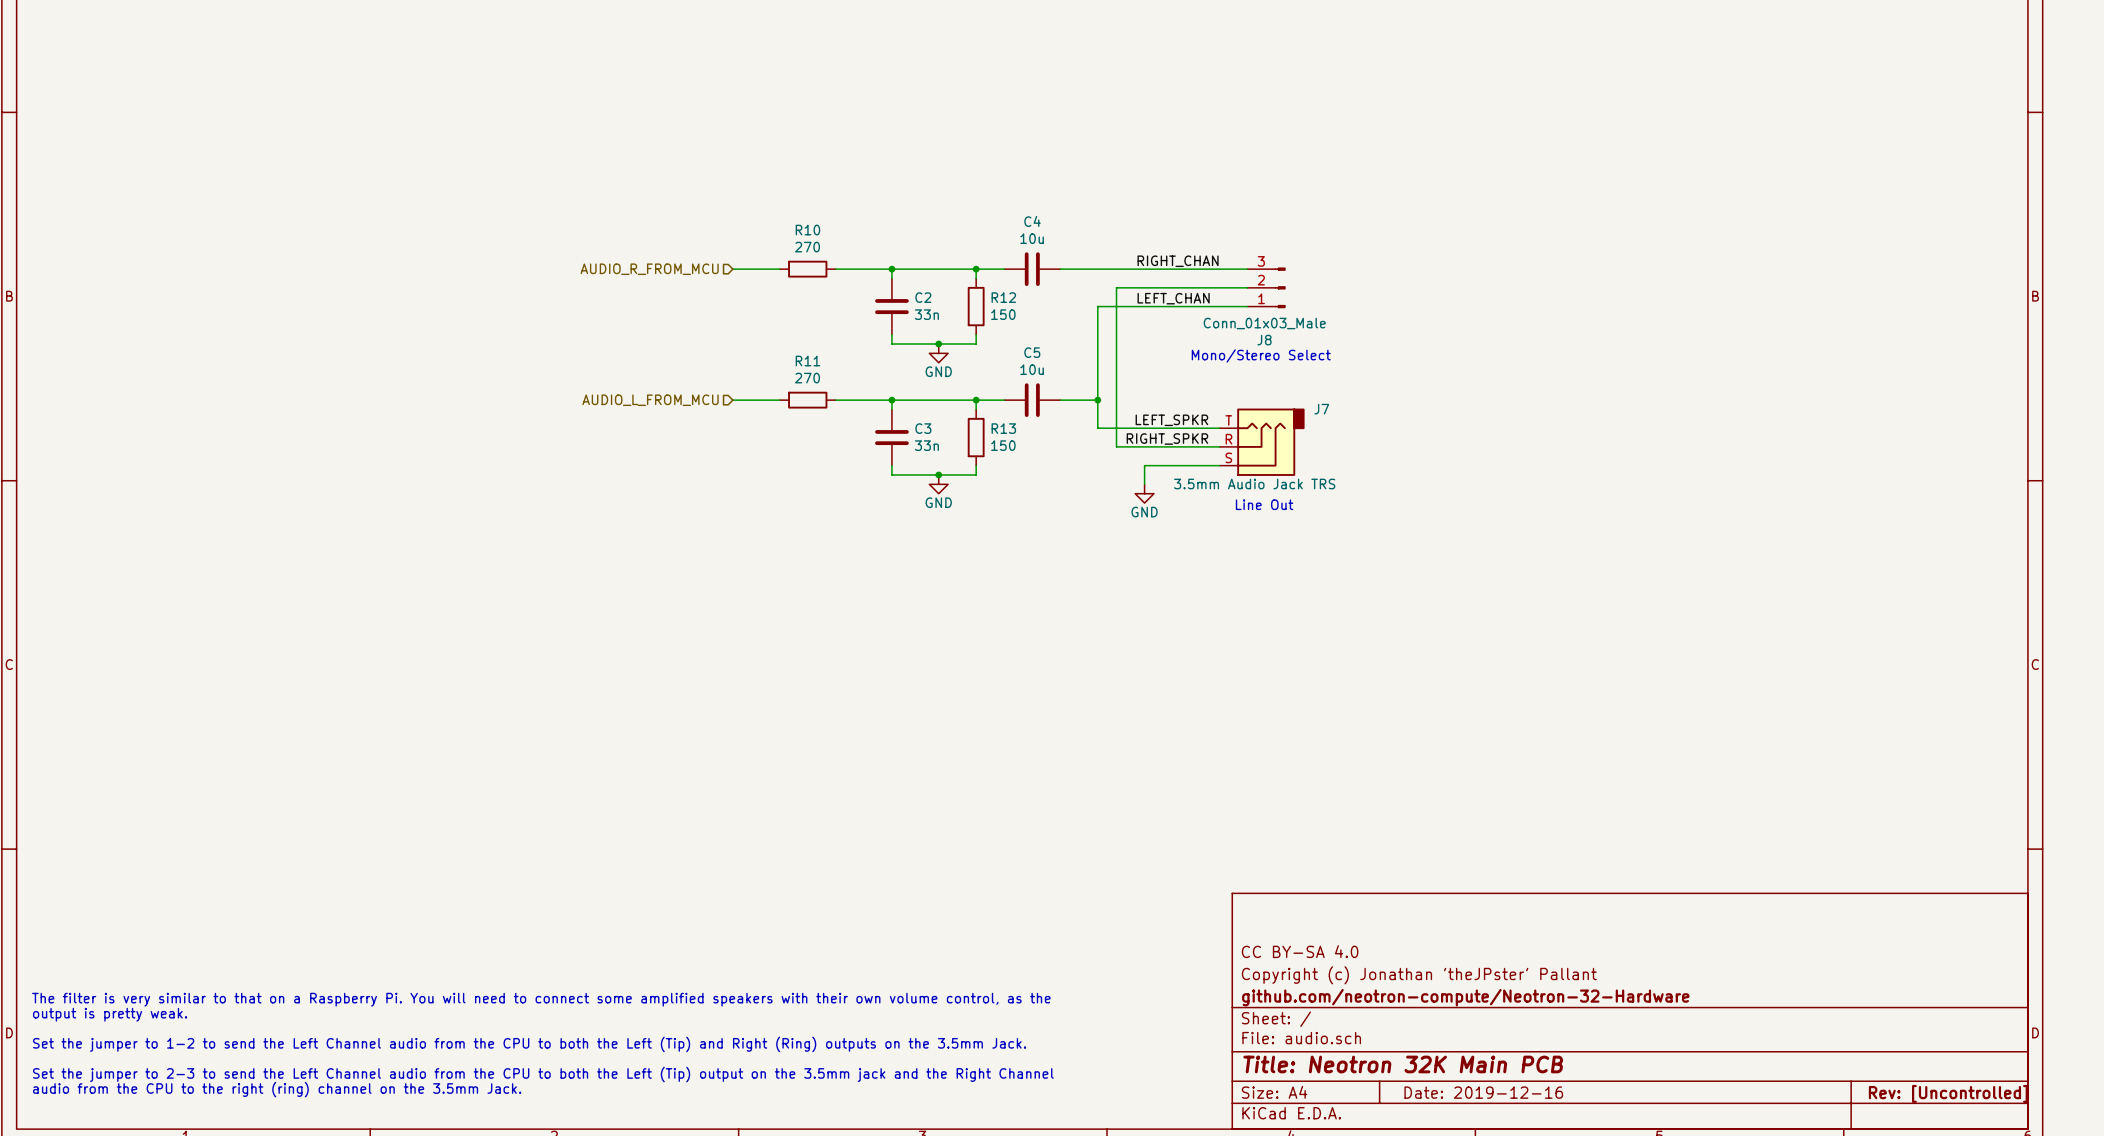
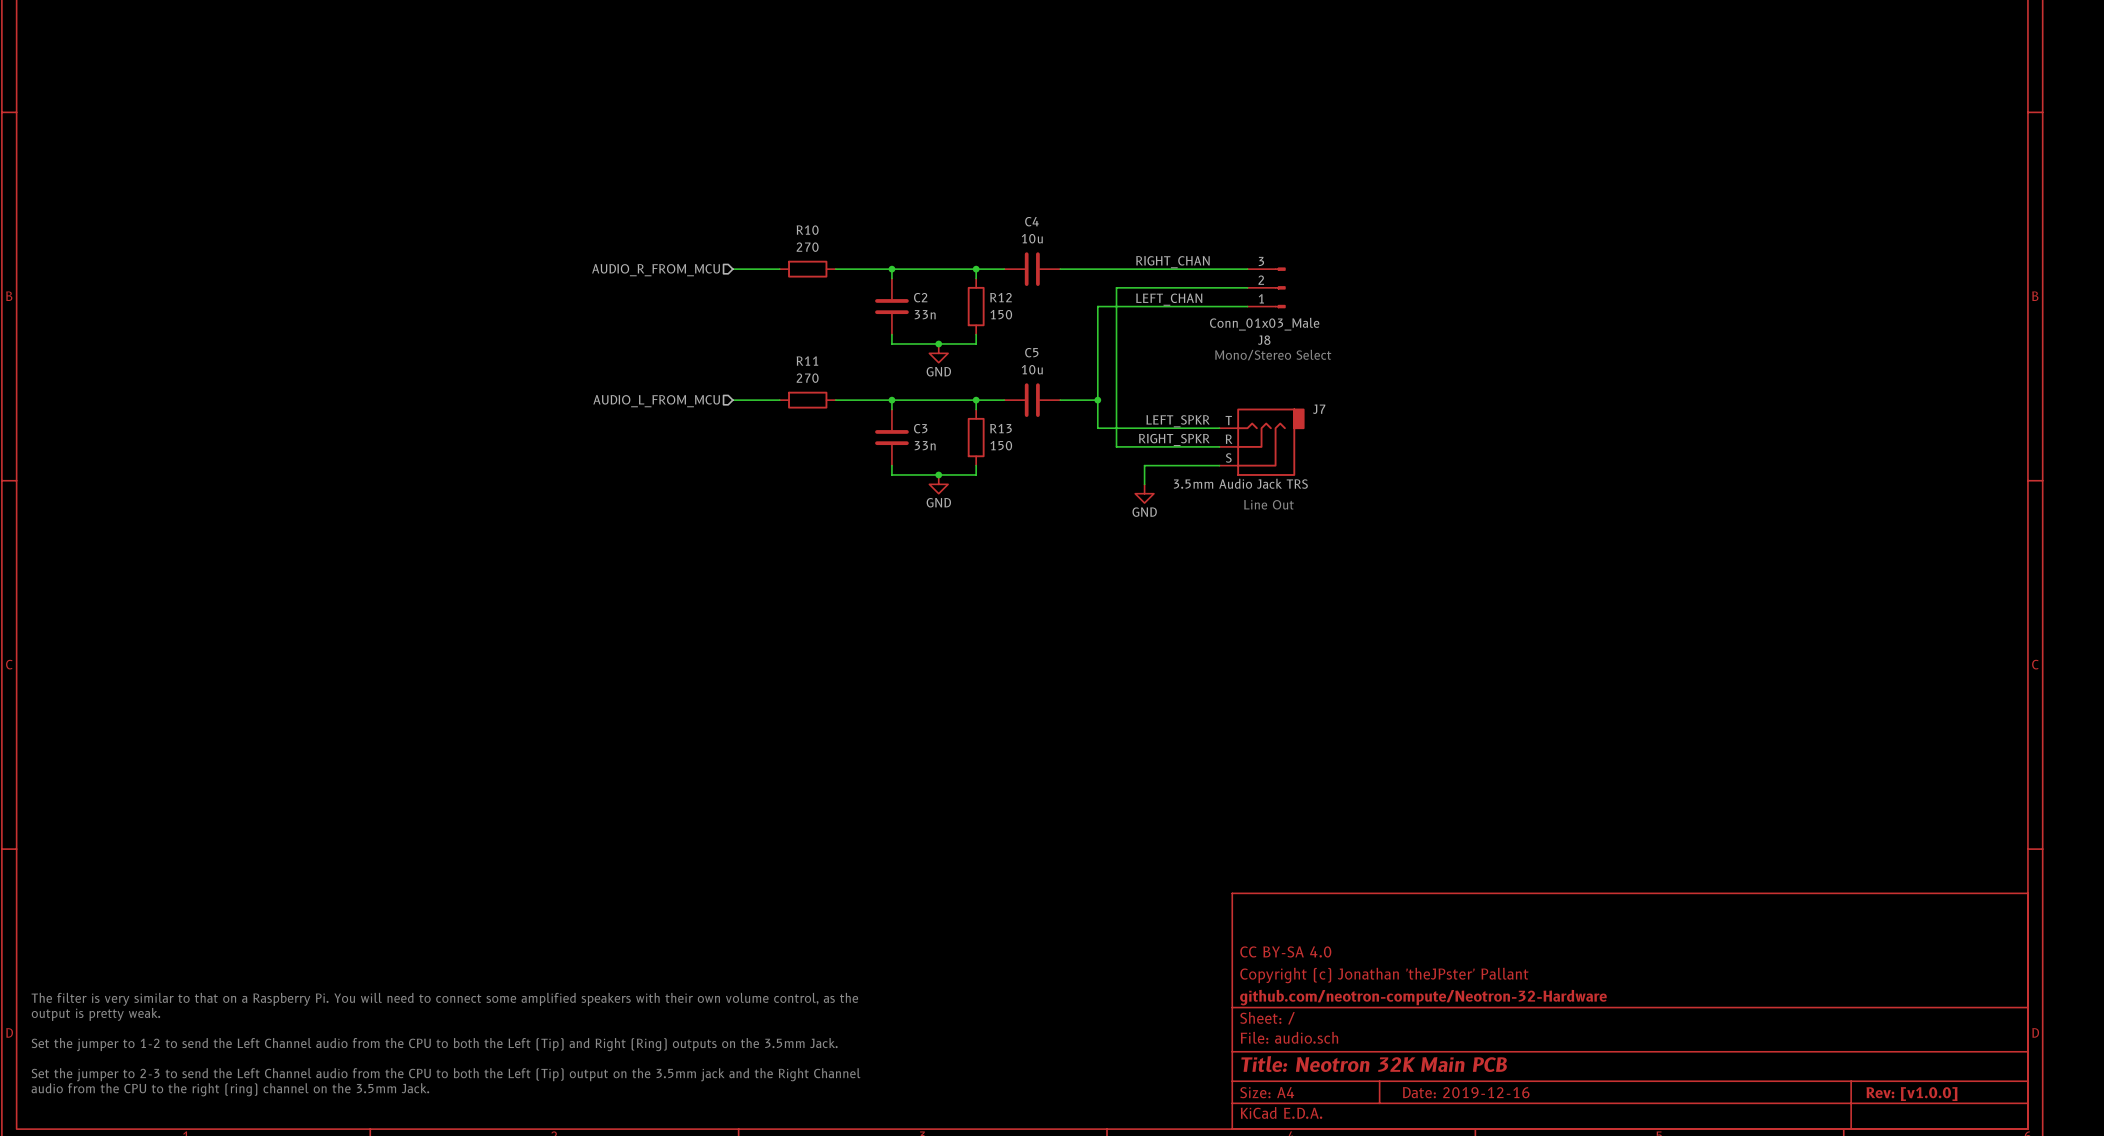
title block: Rev: [Uncontrolled] (1948, 1093) -> Rev: [v1.0.0] (1912, 1094)

